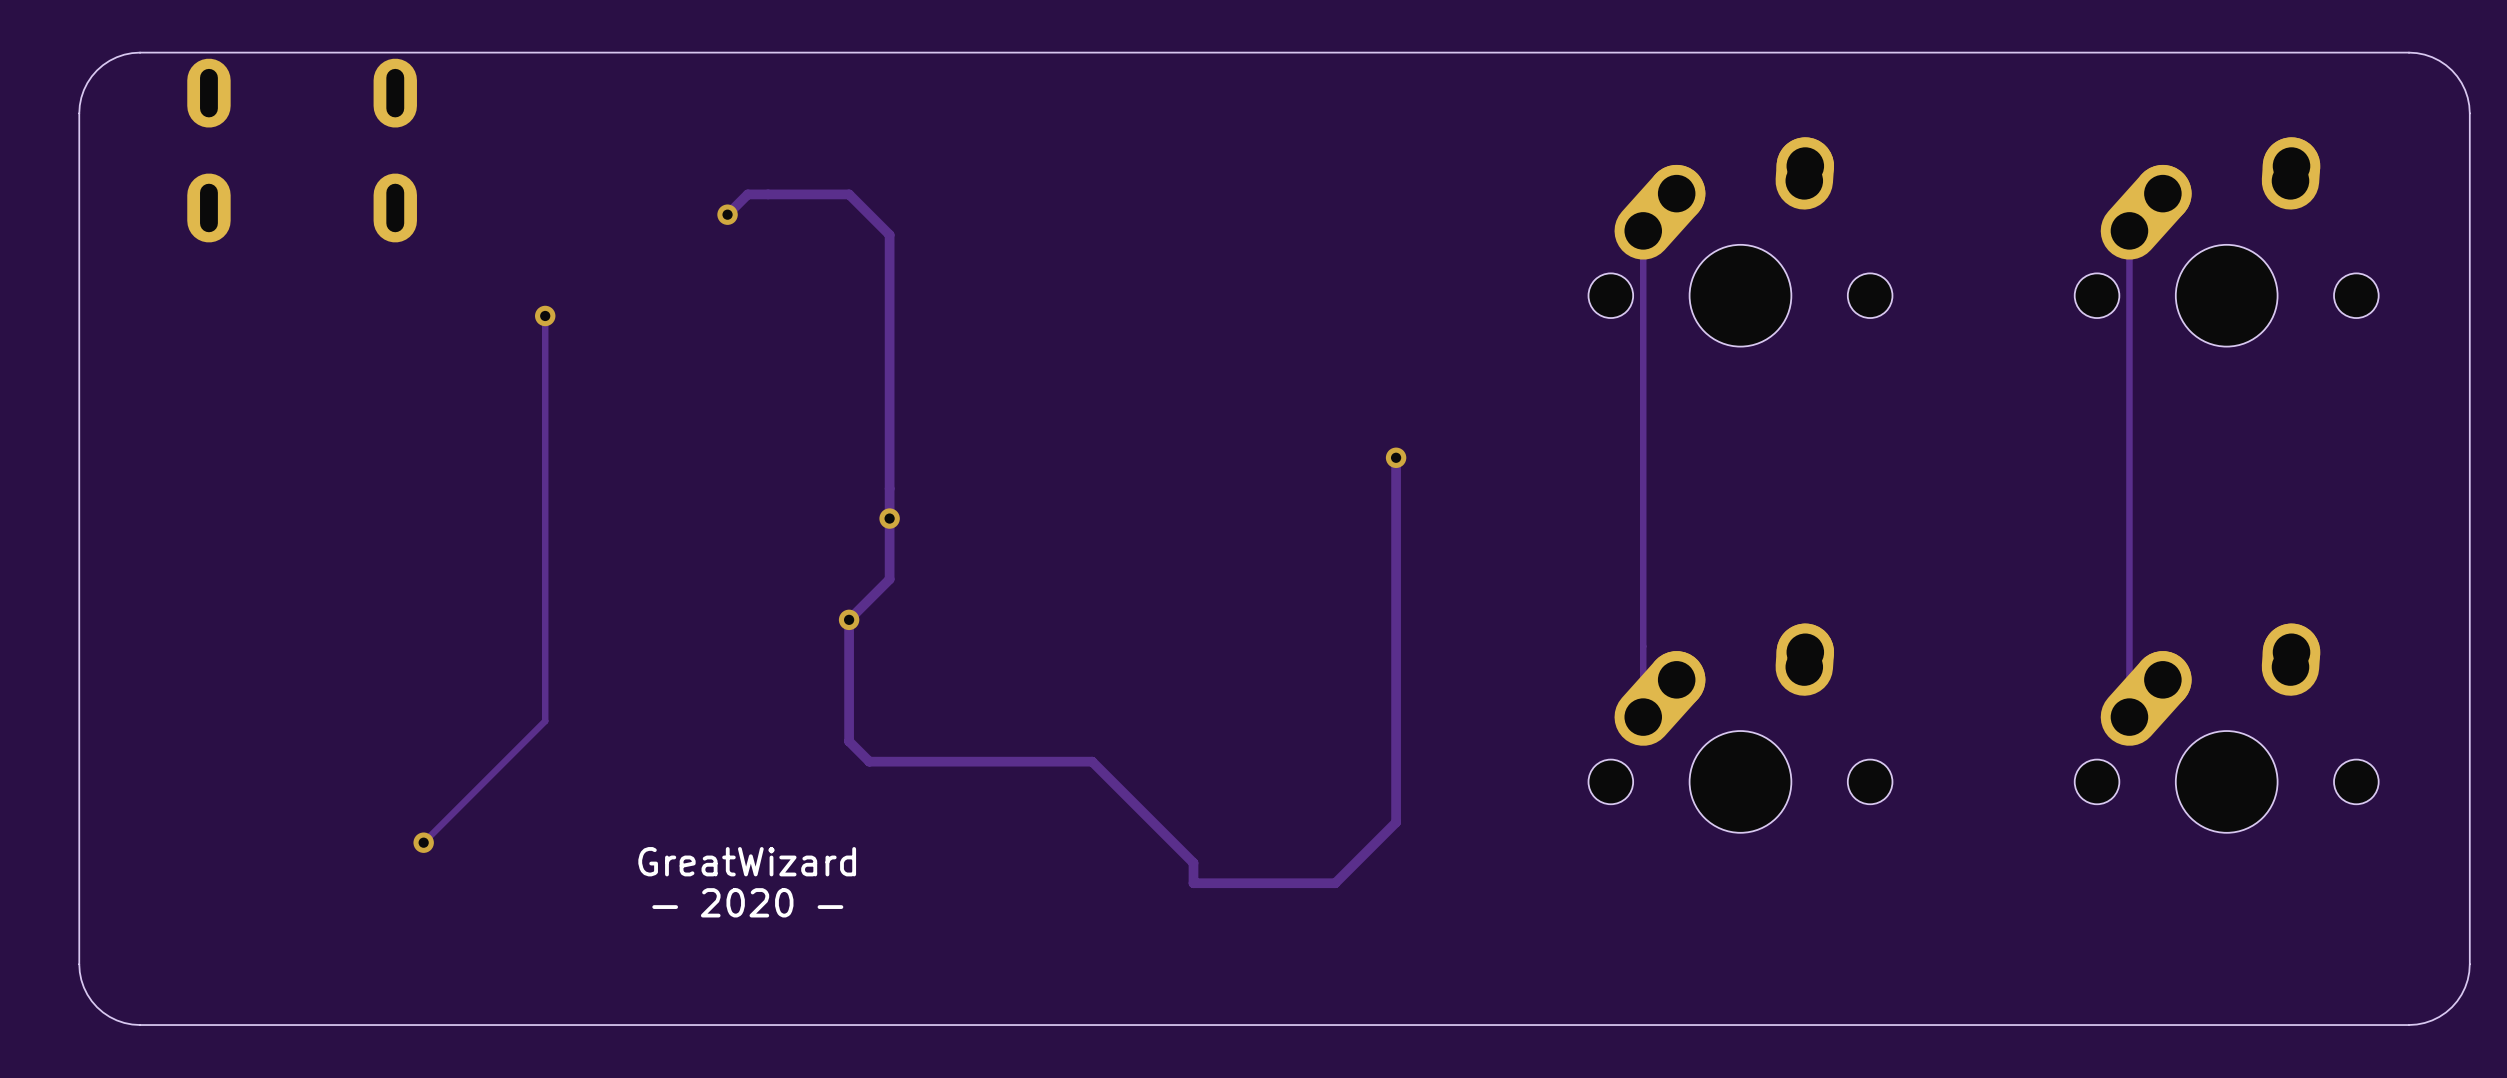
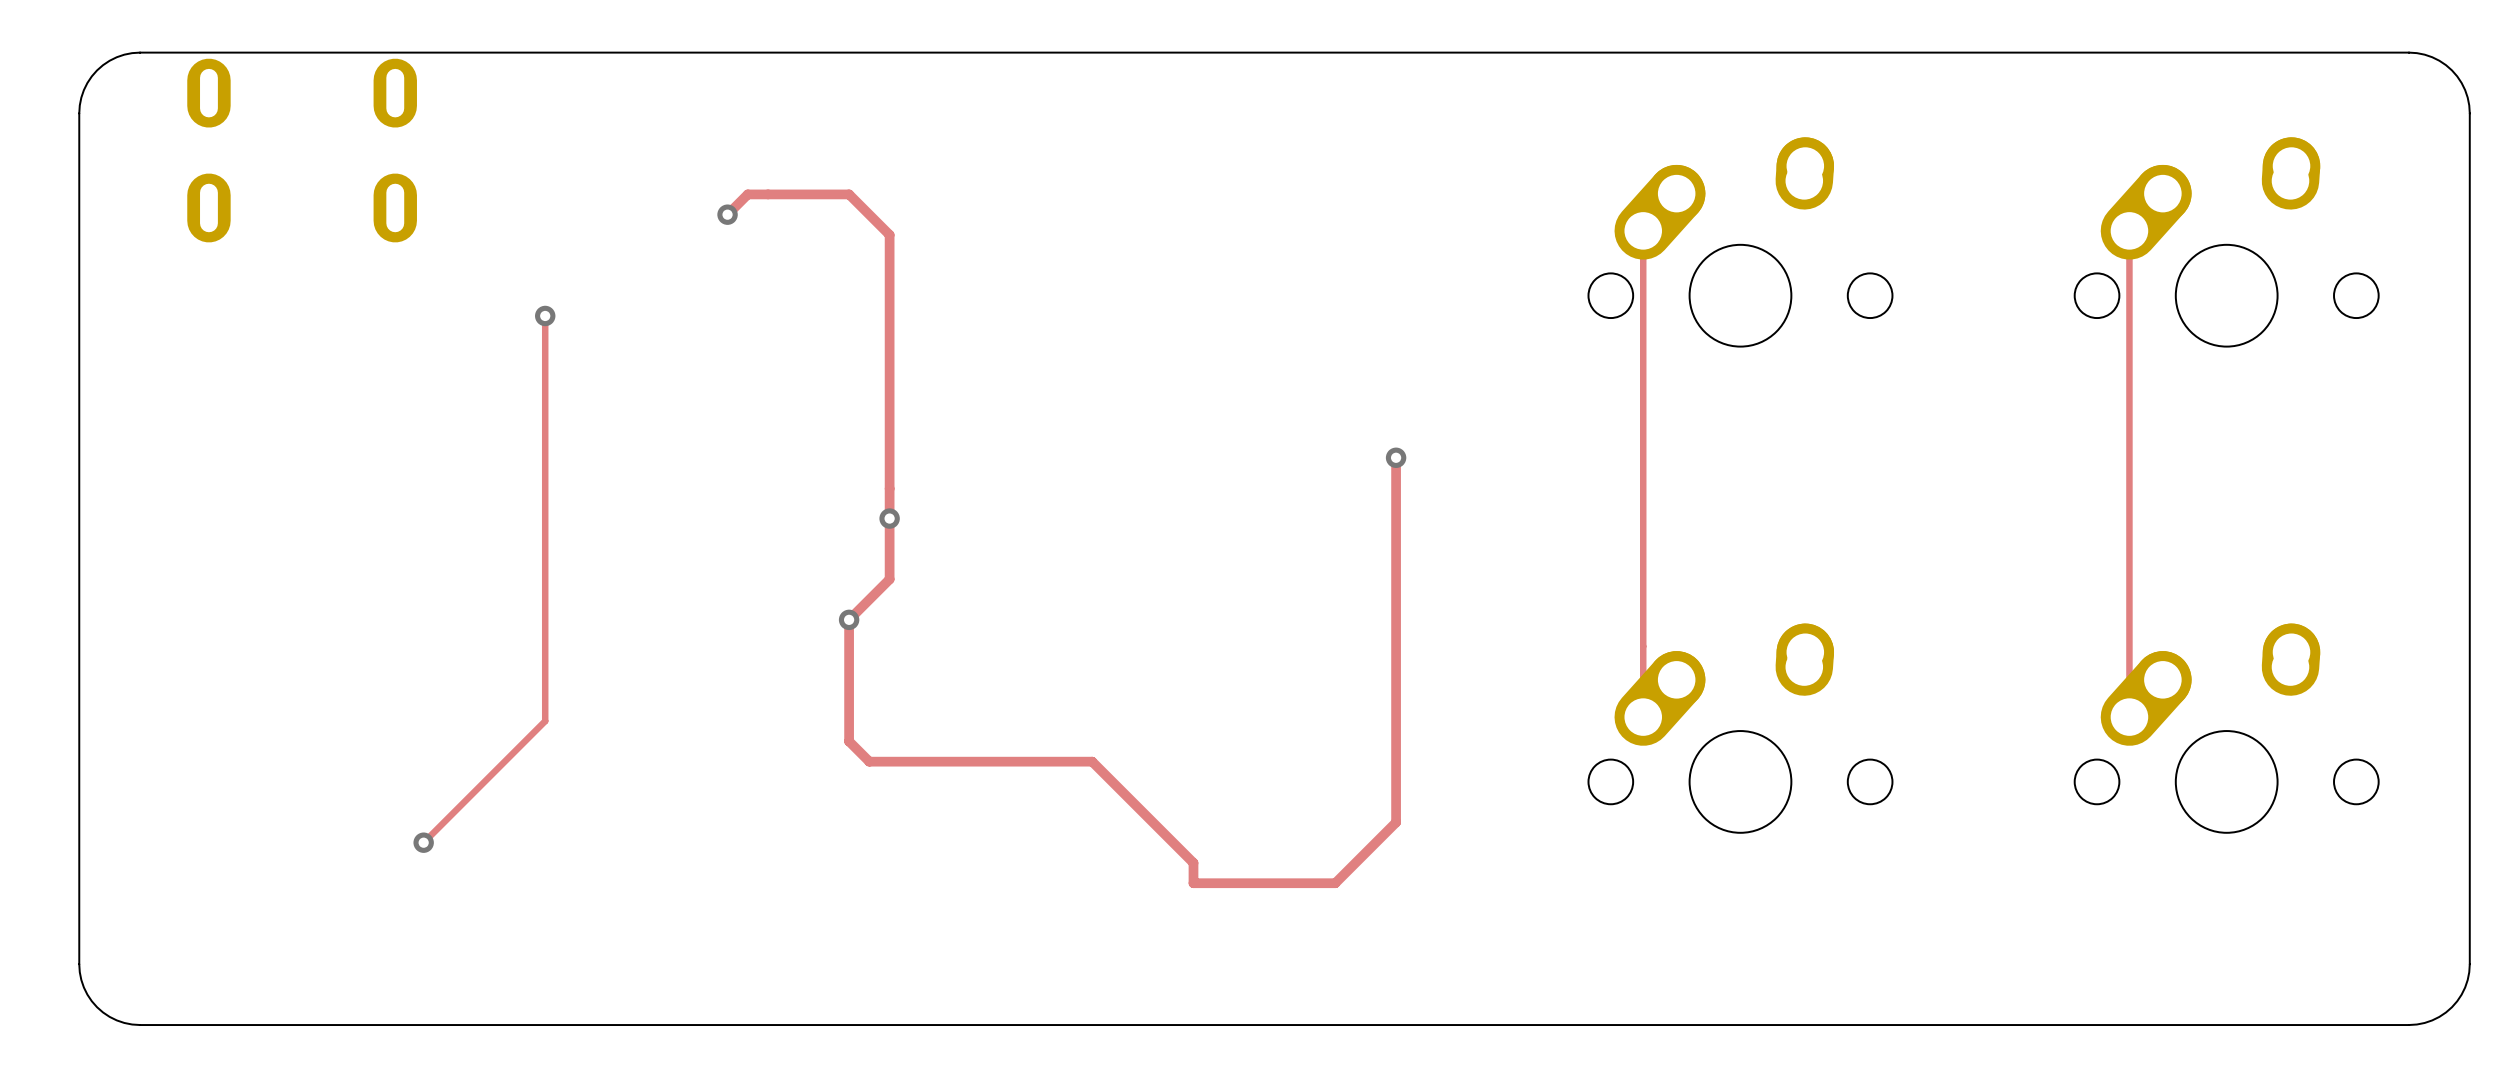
text: GreatWizard (747, 861) -> none
text: — 2020 — (747, 902) -> none

